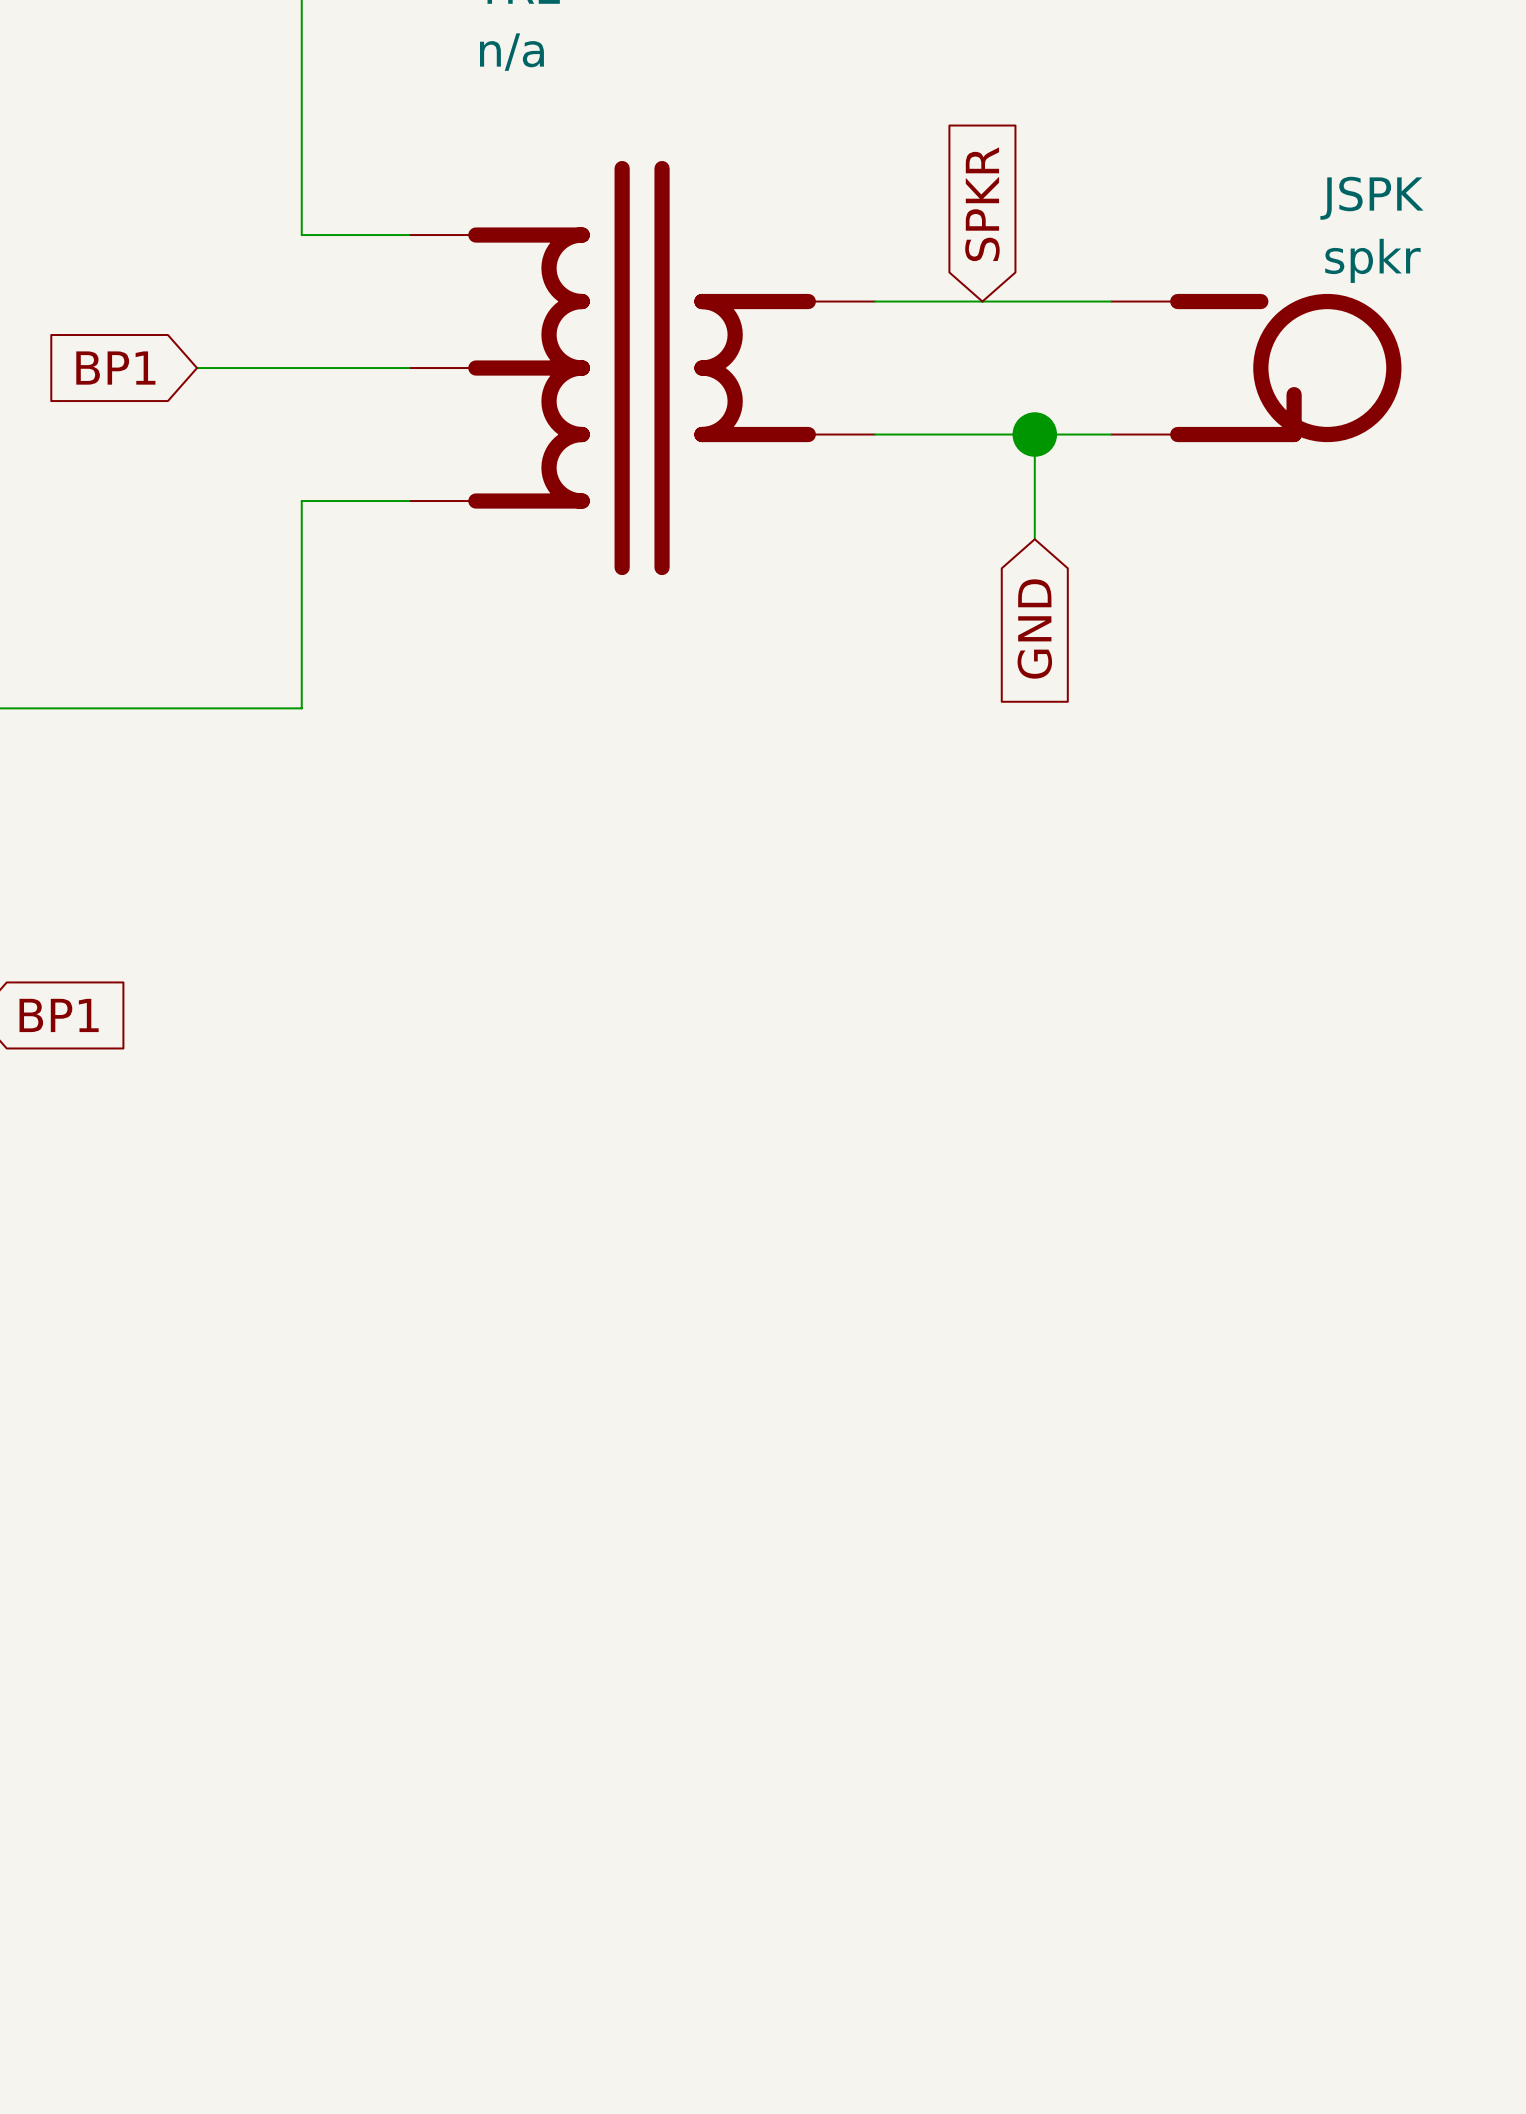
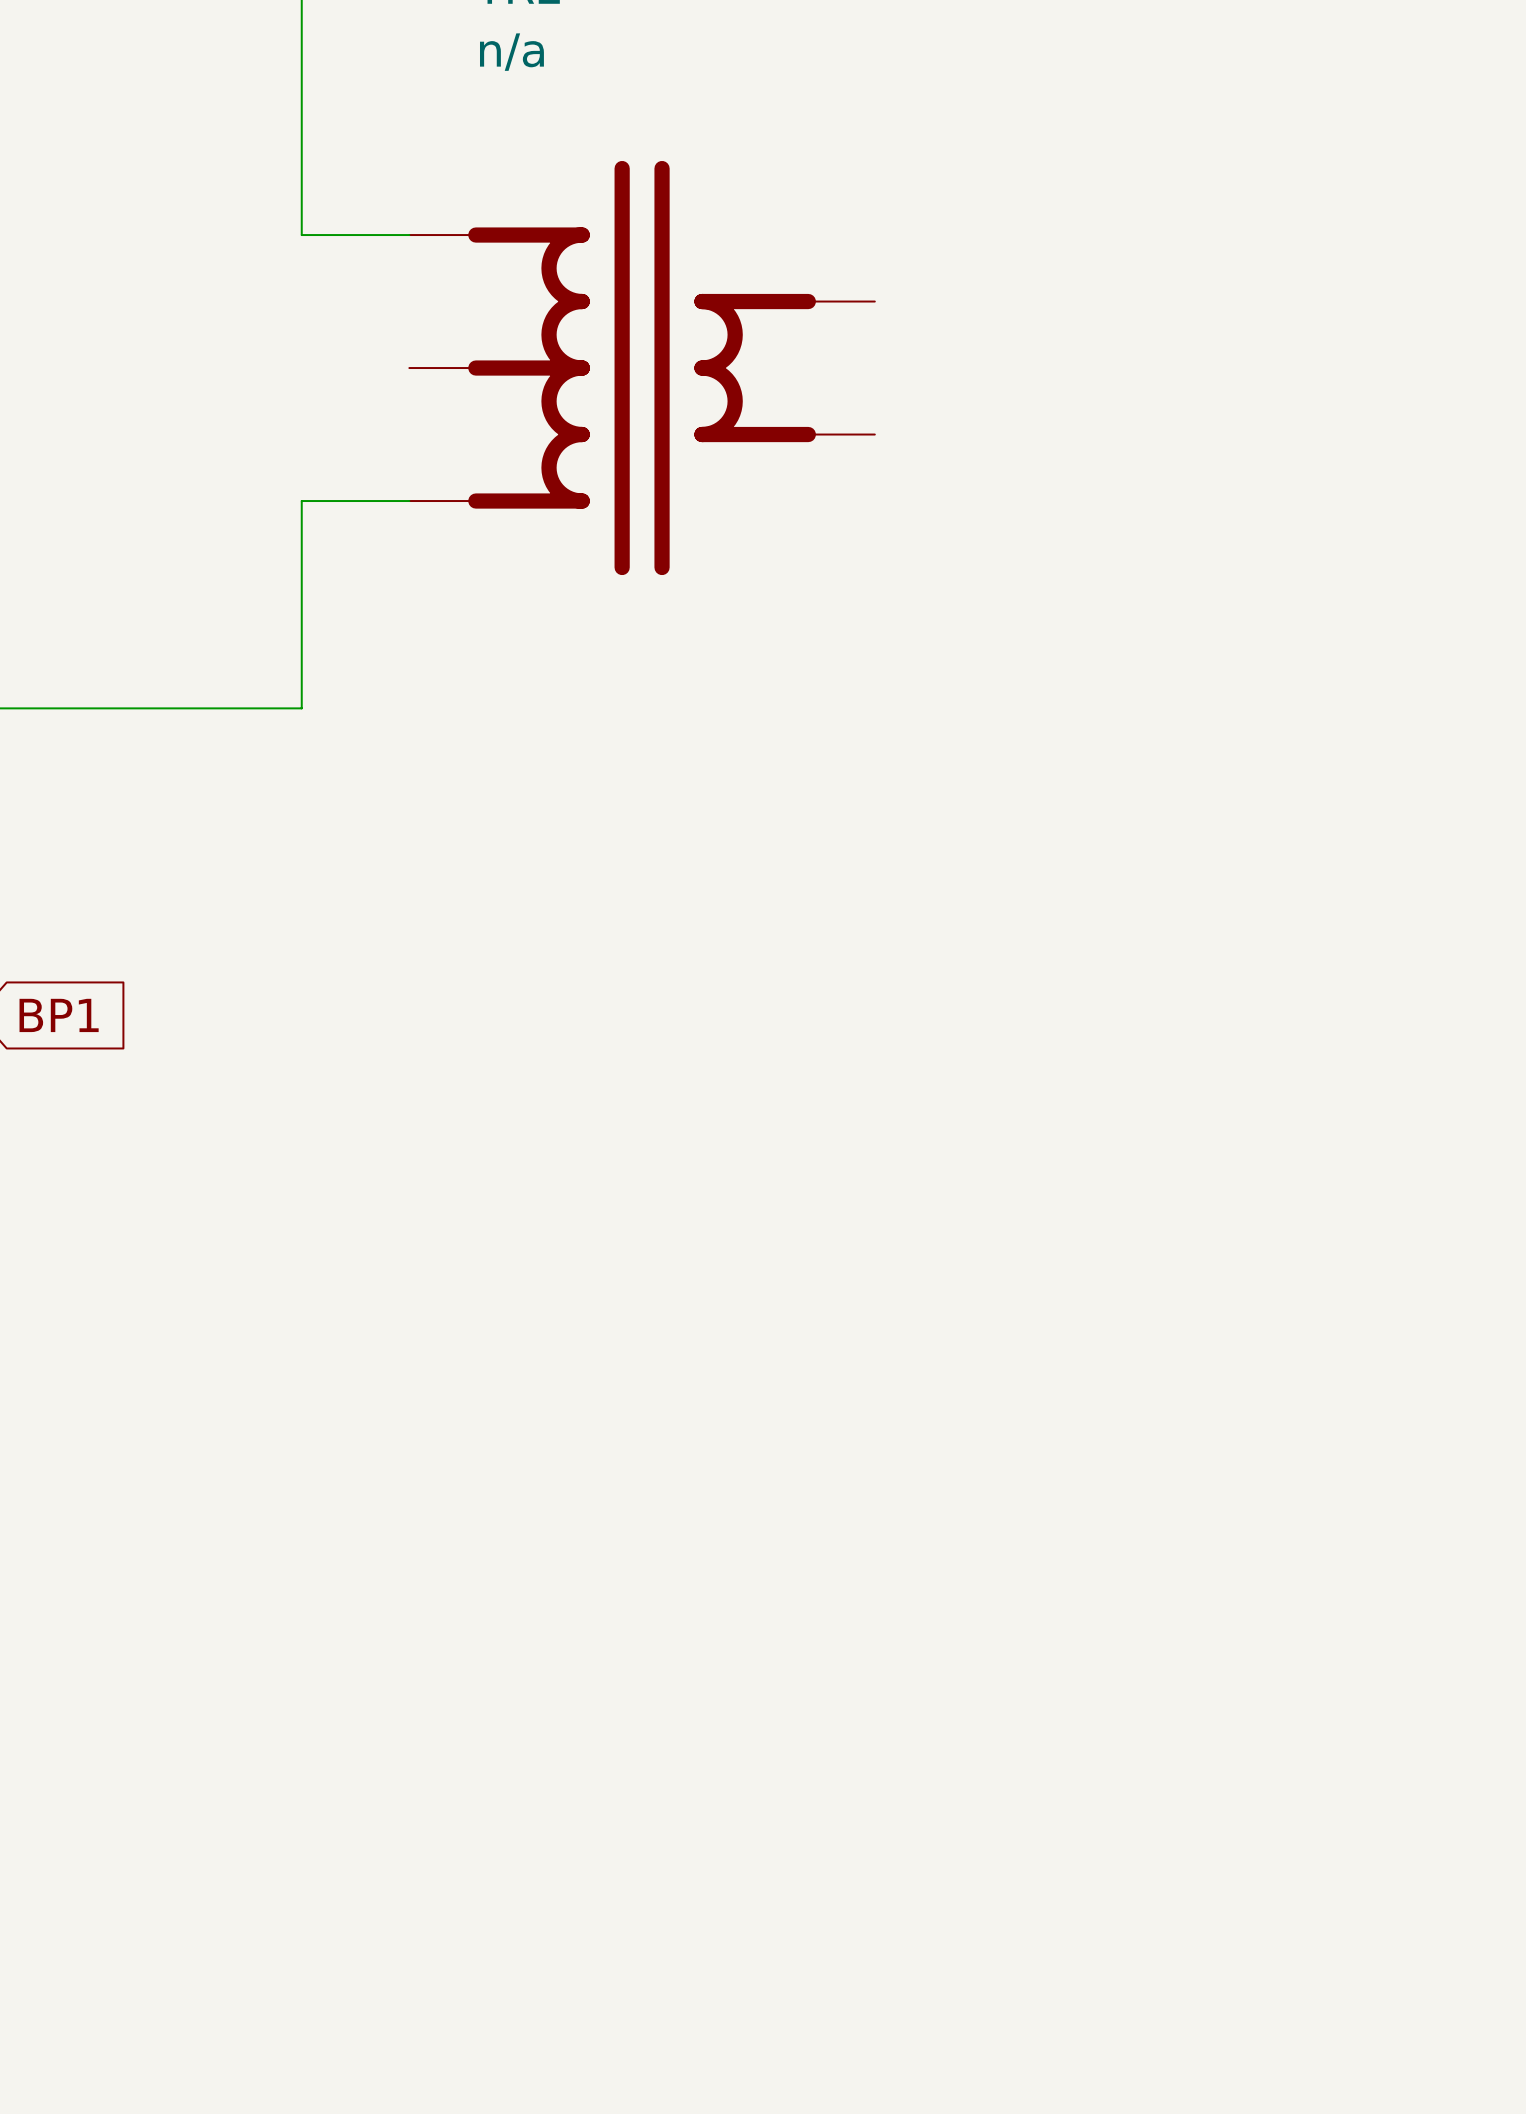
global label: SPKR (982, 204) -> none
wire: (874, 301) (1111, 301) -> none
global label: BP1 (115, 368) -> none
wire: (197, 368) (409, 368) -> none
JSPK: spkr (1256, 368) -> none
wire: (874, 434) (1111, 434) -> none
wire: (1034, 434) (1034, 539) -> none
junction: (1034, 434) -> none
global label: GND (1034, 629) -> none

